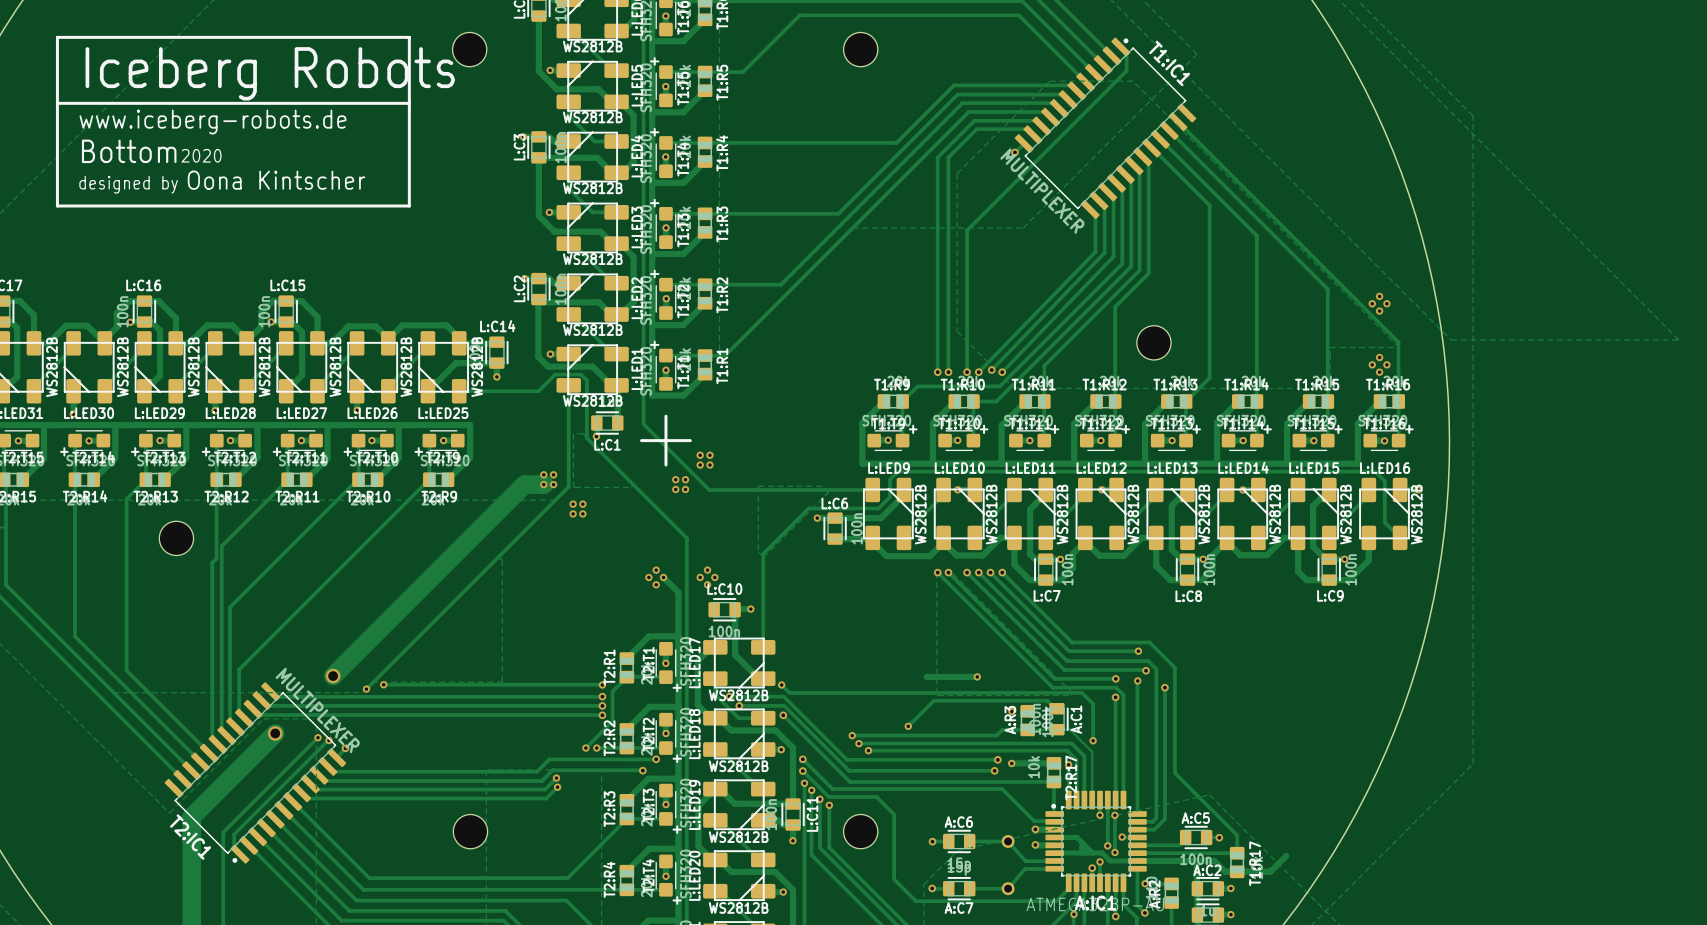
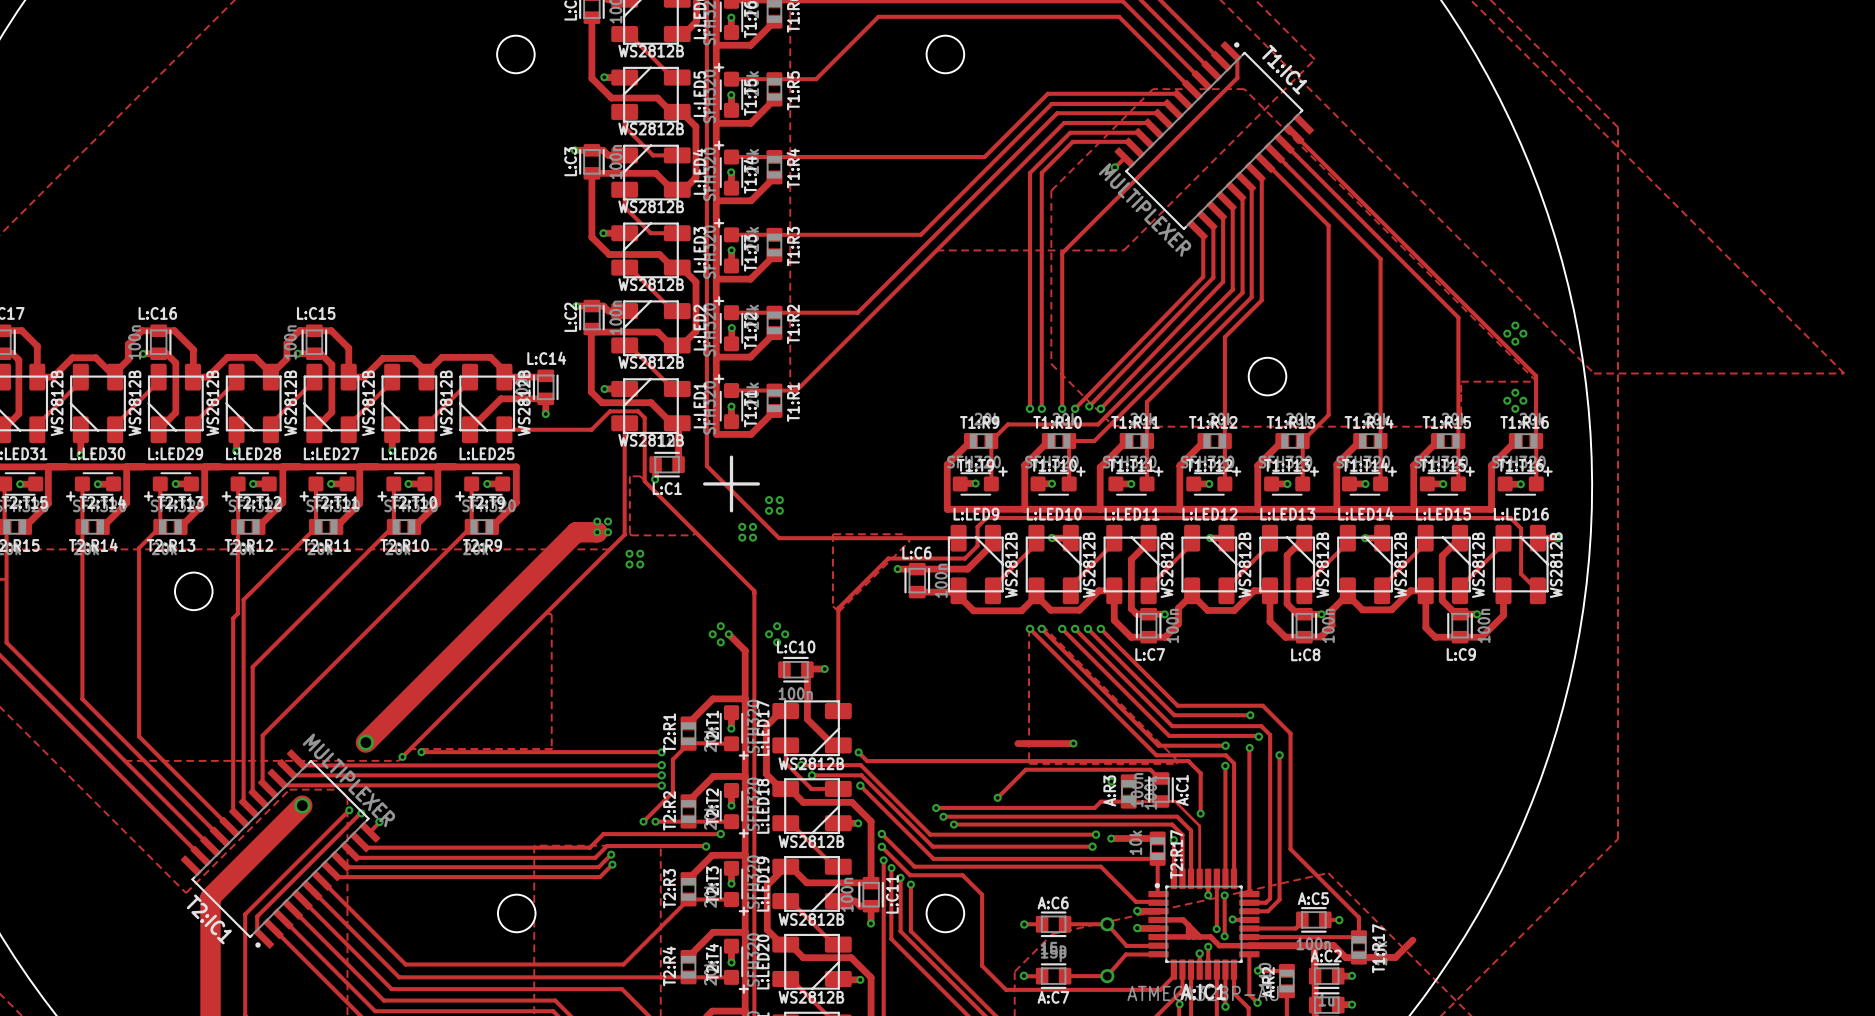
line: (57, 37) (57, 205) (409, 205) (409, 37) (57, 37) -> none
text: Iceberg Robots (270, 73) -> none
line: (57, 103) (409, 103) -> none
text: www.iceberg-robots.de (212, 122) -> none
text: Bottom (129, 151) -> none
text: 2020 (201, 155) -> none
text: Oona Kintscher (276, 180) -> none
text: designed by (128, 184) -> none

